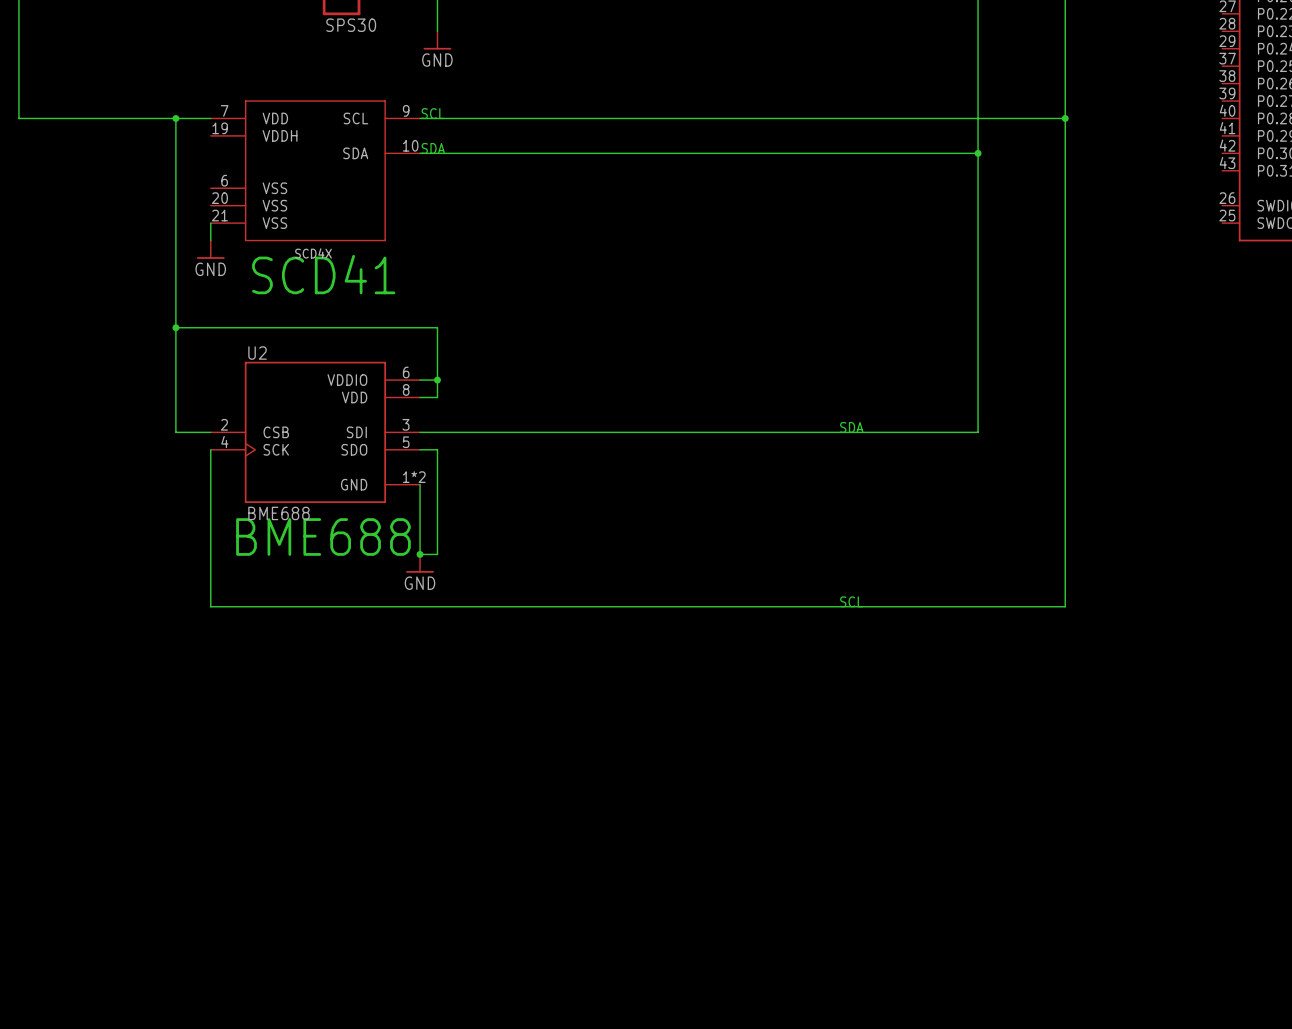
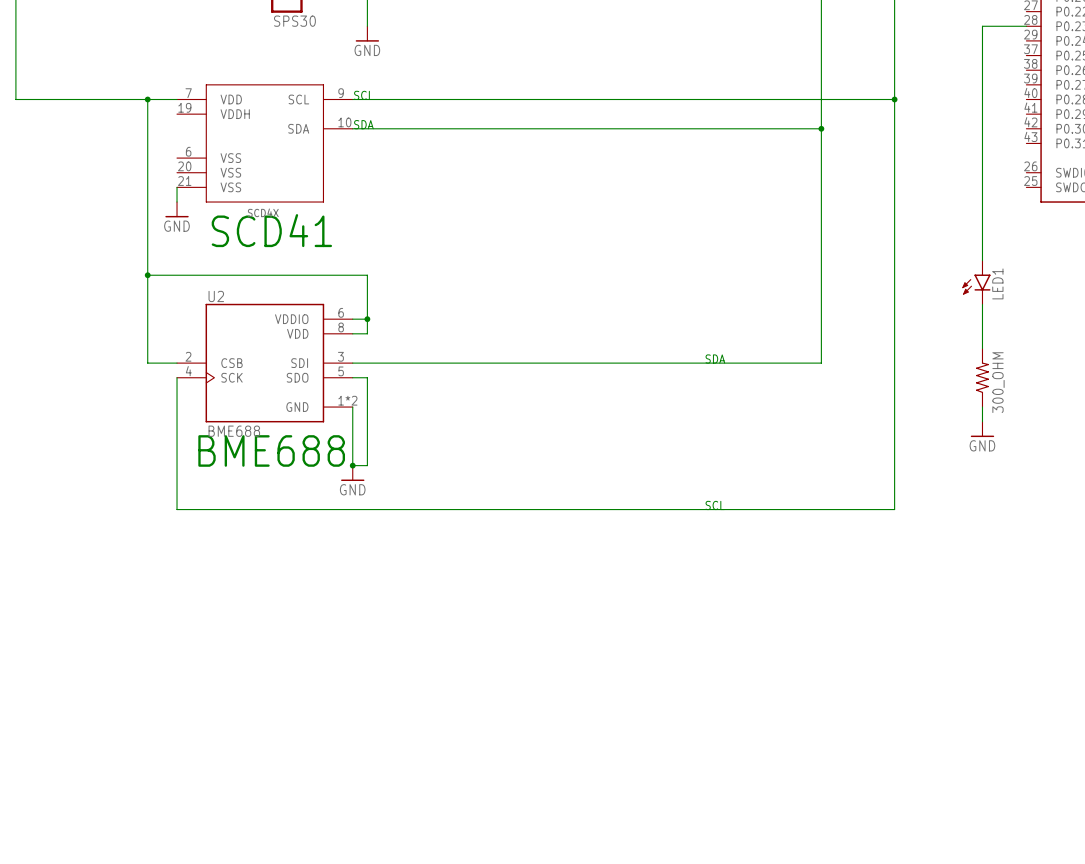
wire: none -> (1026, 26) (982, 26) (982, 260)
LED1: none -> (976, 282)
wire: none -> (982, 304) (982, 348)
300_OHM: none -> (982, 377)
wire: none -> (982, 407) (982, 421)
power symbol: none -> GND (982, 429)

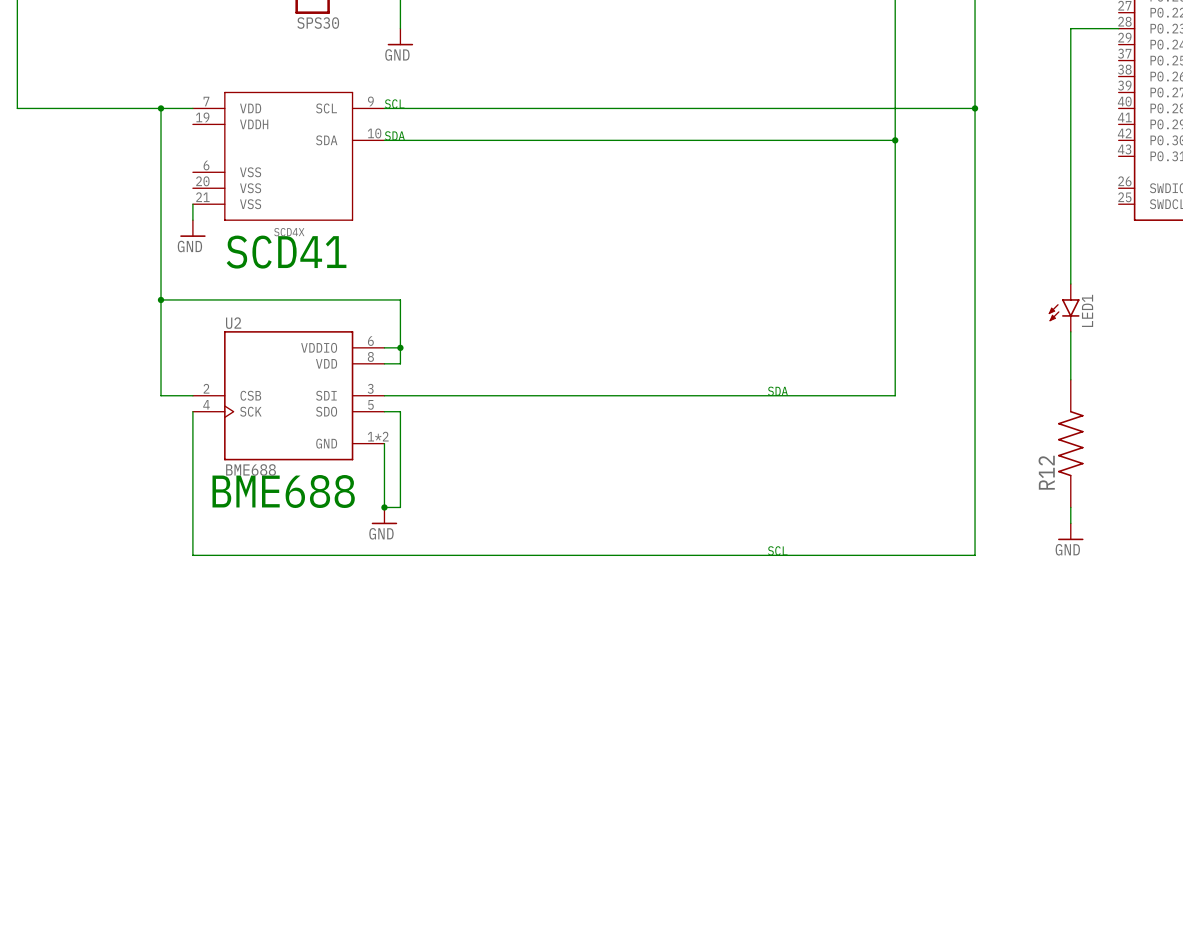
300_OHM: (982, 377) -> none
wire: (982, 407) (982, 421) -> (1070, 507) (1070, 523)
R12: none -> (1070, 443)
power symbol position: GND (982, 429) -> GND (1070, 531)

